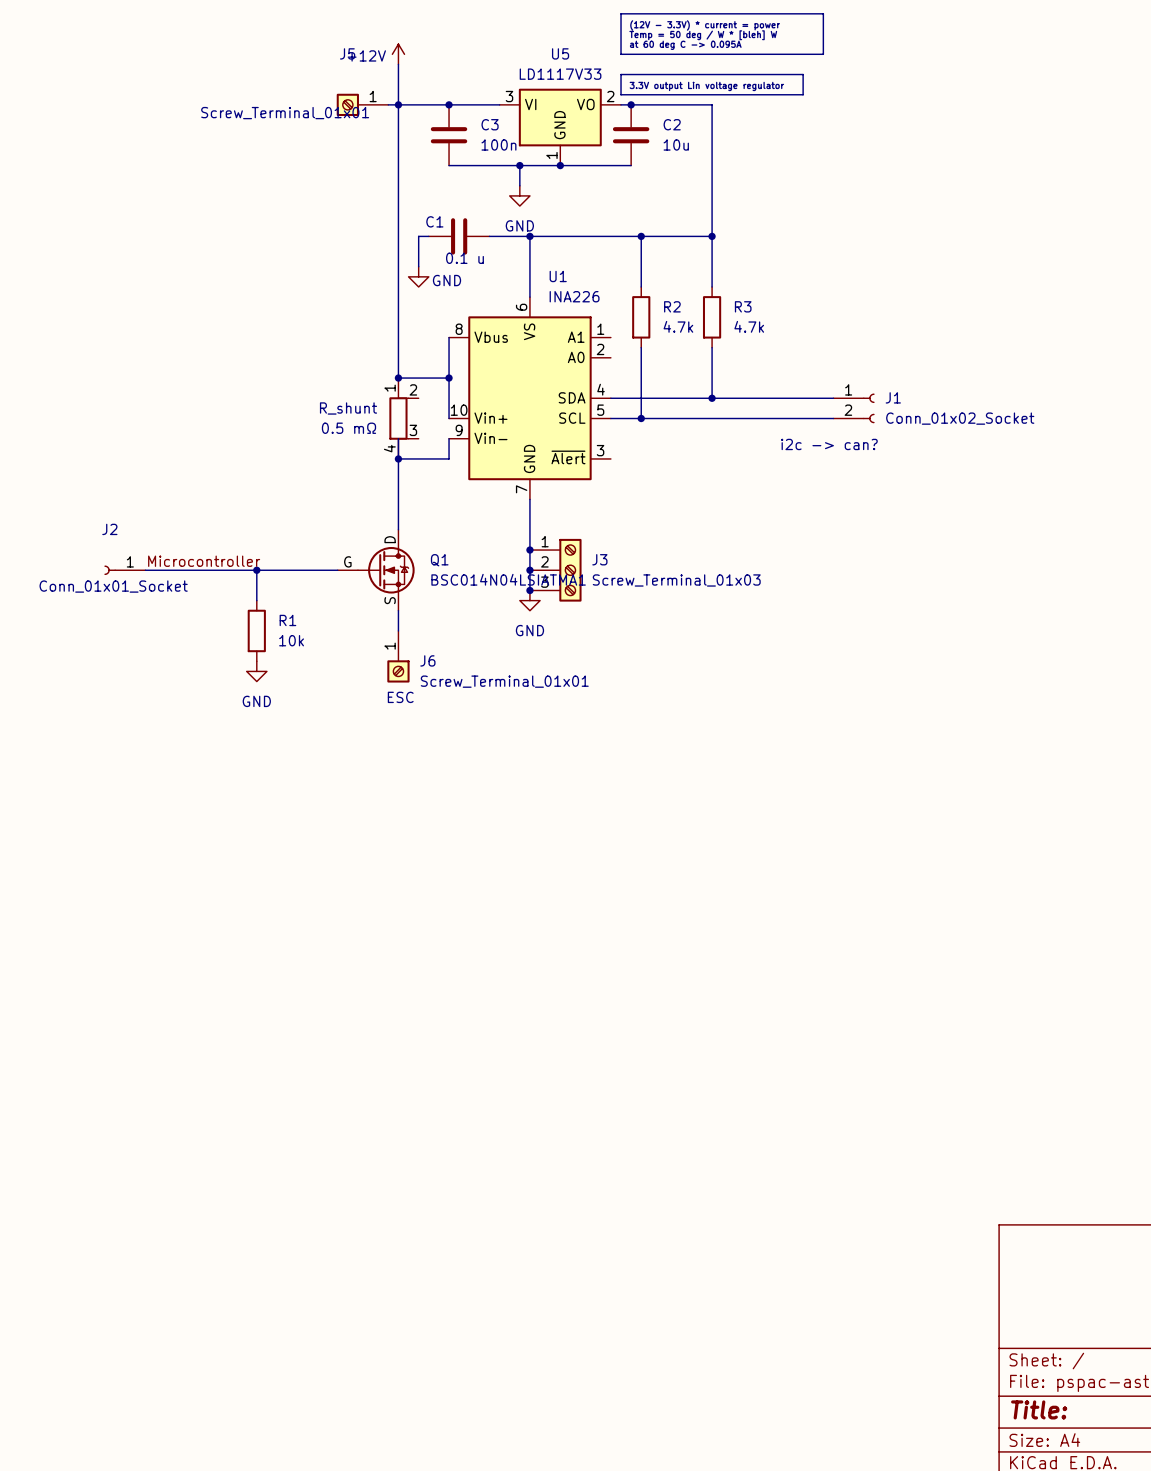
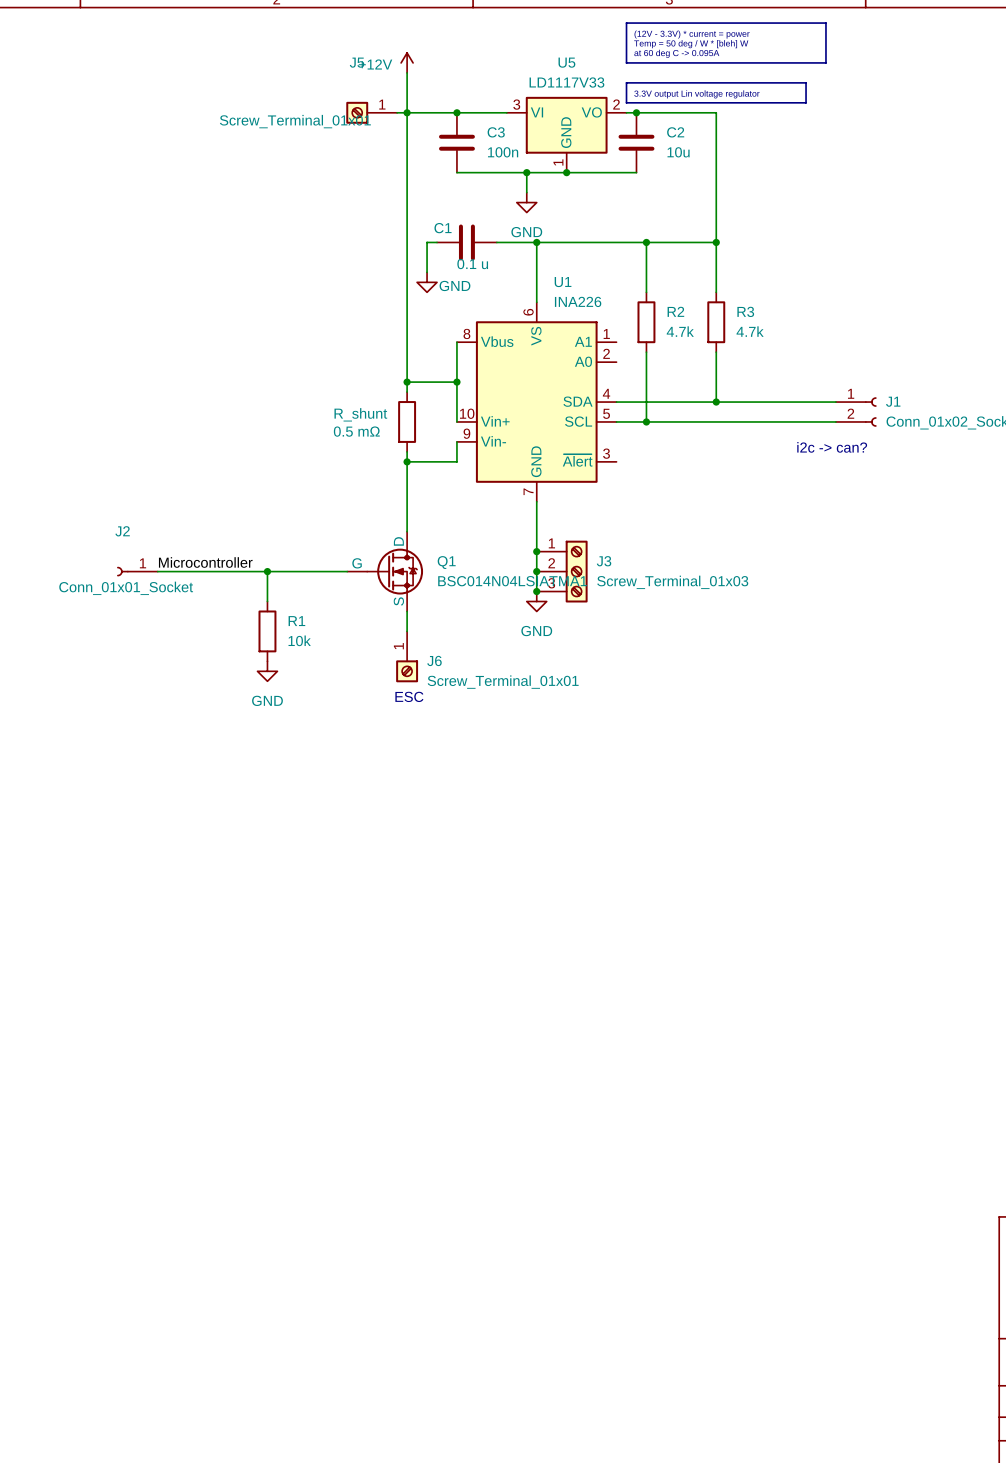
R_shunt symbol: [389, 378, 419, 459] -> [398, 392, 417, 452]
R_shunt name position: R_shunt (348, 408) -> R_shunt (360, 414)
R_shunt value position: 0.5 mΩ (348, 428) -> 0.5 mΩ (356, 431)

